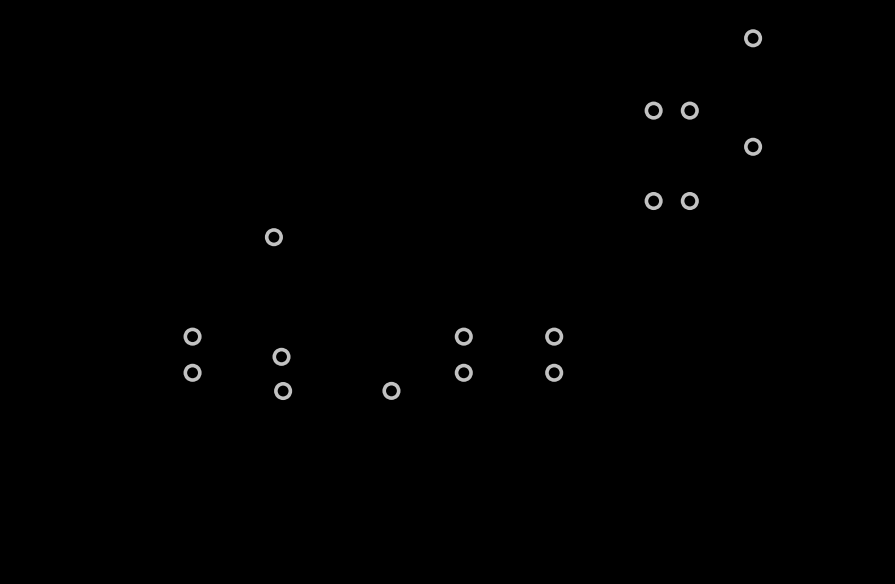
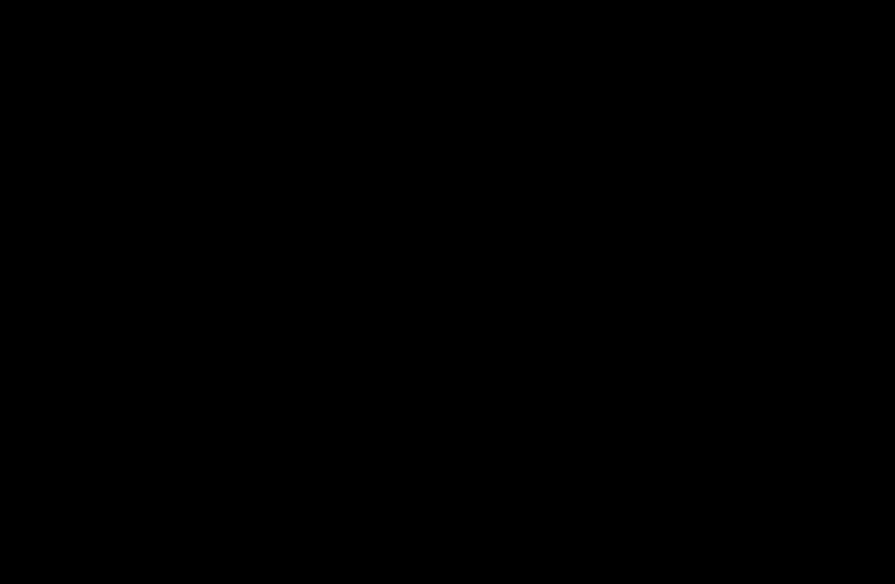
via: (753, 38) -> none
via: (653, 110) -> none
via: (689, 110) -> none
via: (753, 146) -> none
via: (653, 201) -> none
via: (689, 201) -> none
via: (273, 237) -> none
via: (192, 336) -> none
via: (463, 336) -> none
via: (554, 336) -> none
via: (281, 356) -> none
via: (192, 372) -> none
via: (463, 372) -> none
via: (554, 372) -> none
via: (391, 390) -> none
via: (283, 391) -> none

